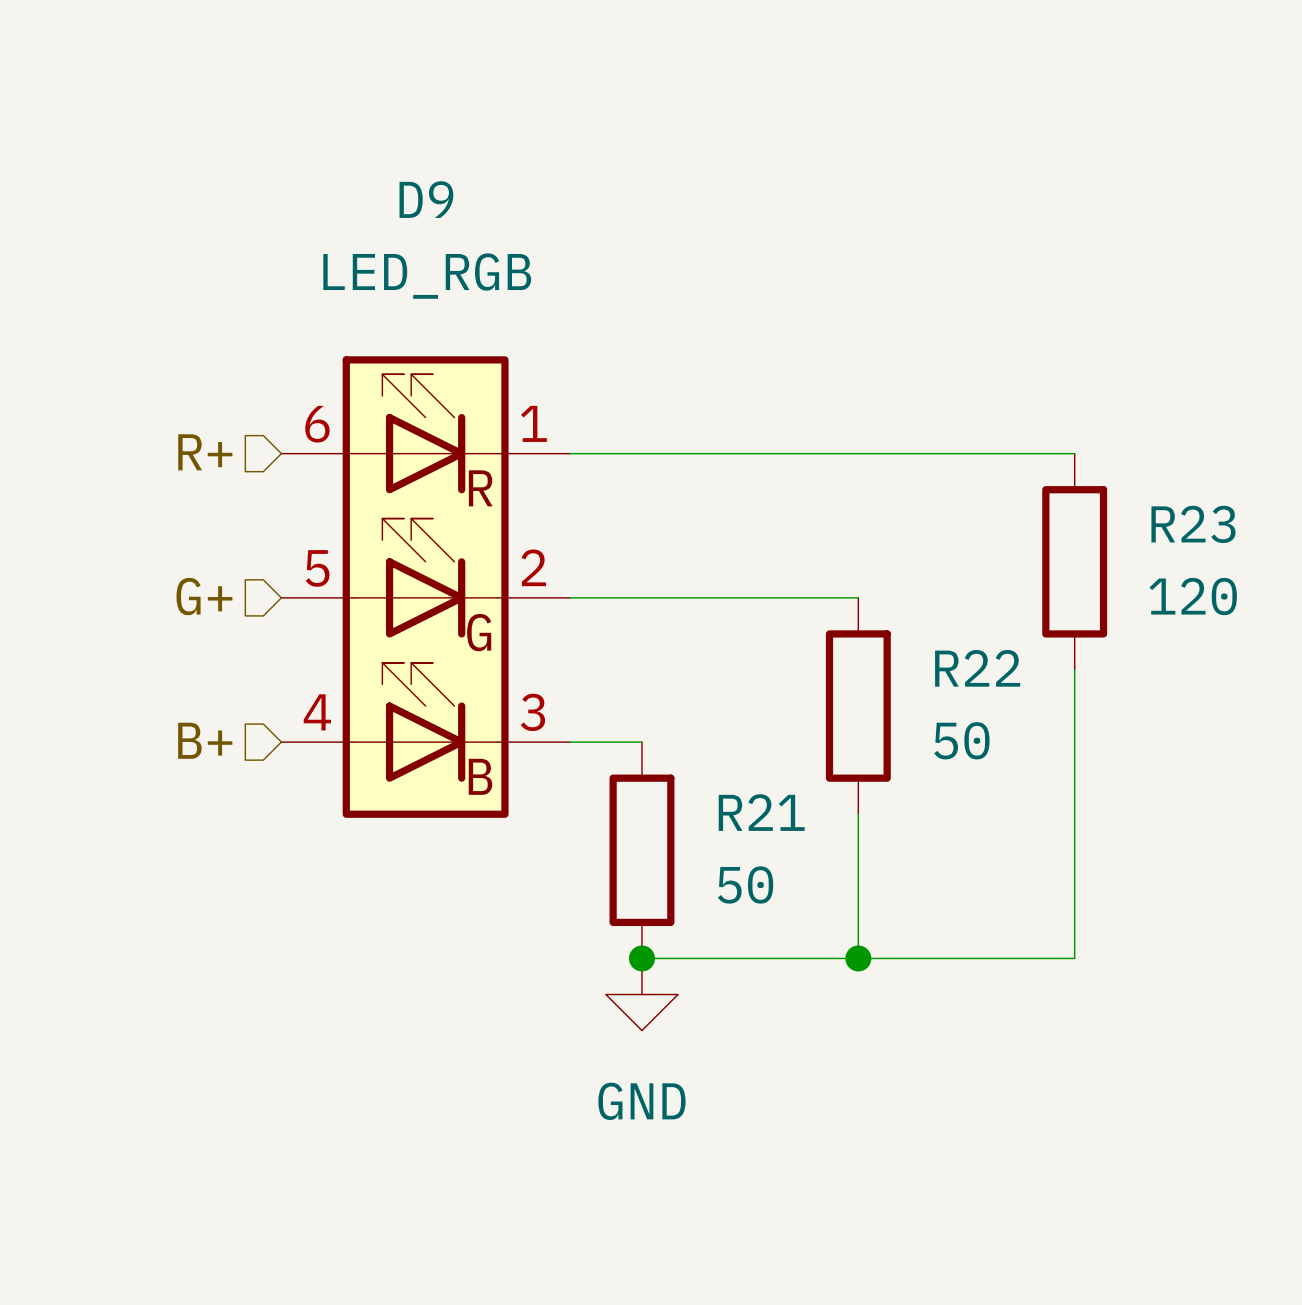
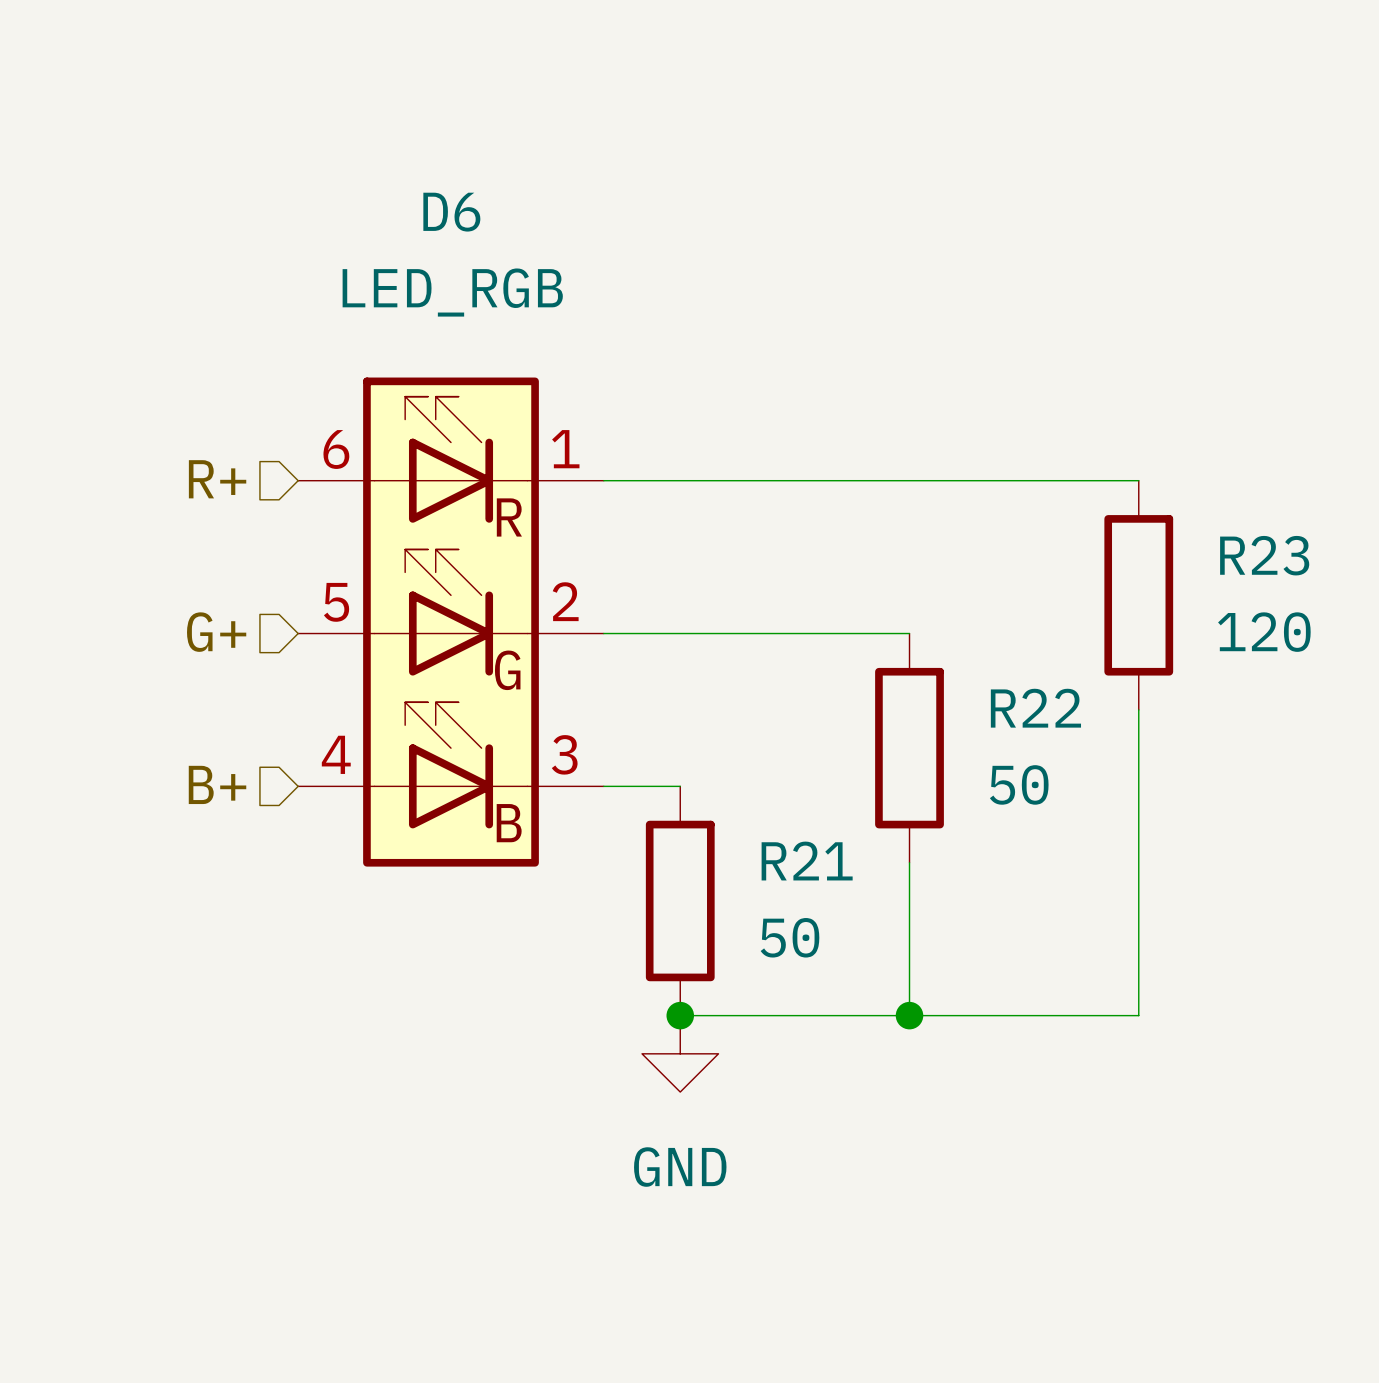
D9 name: D9 (426, 199) -> D6 (451, 212)

